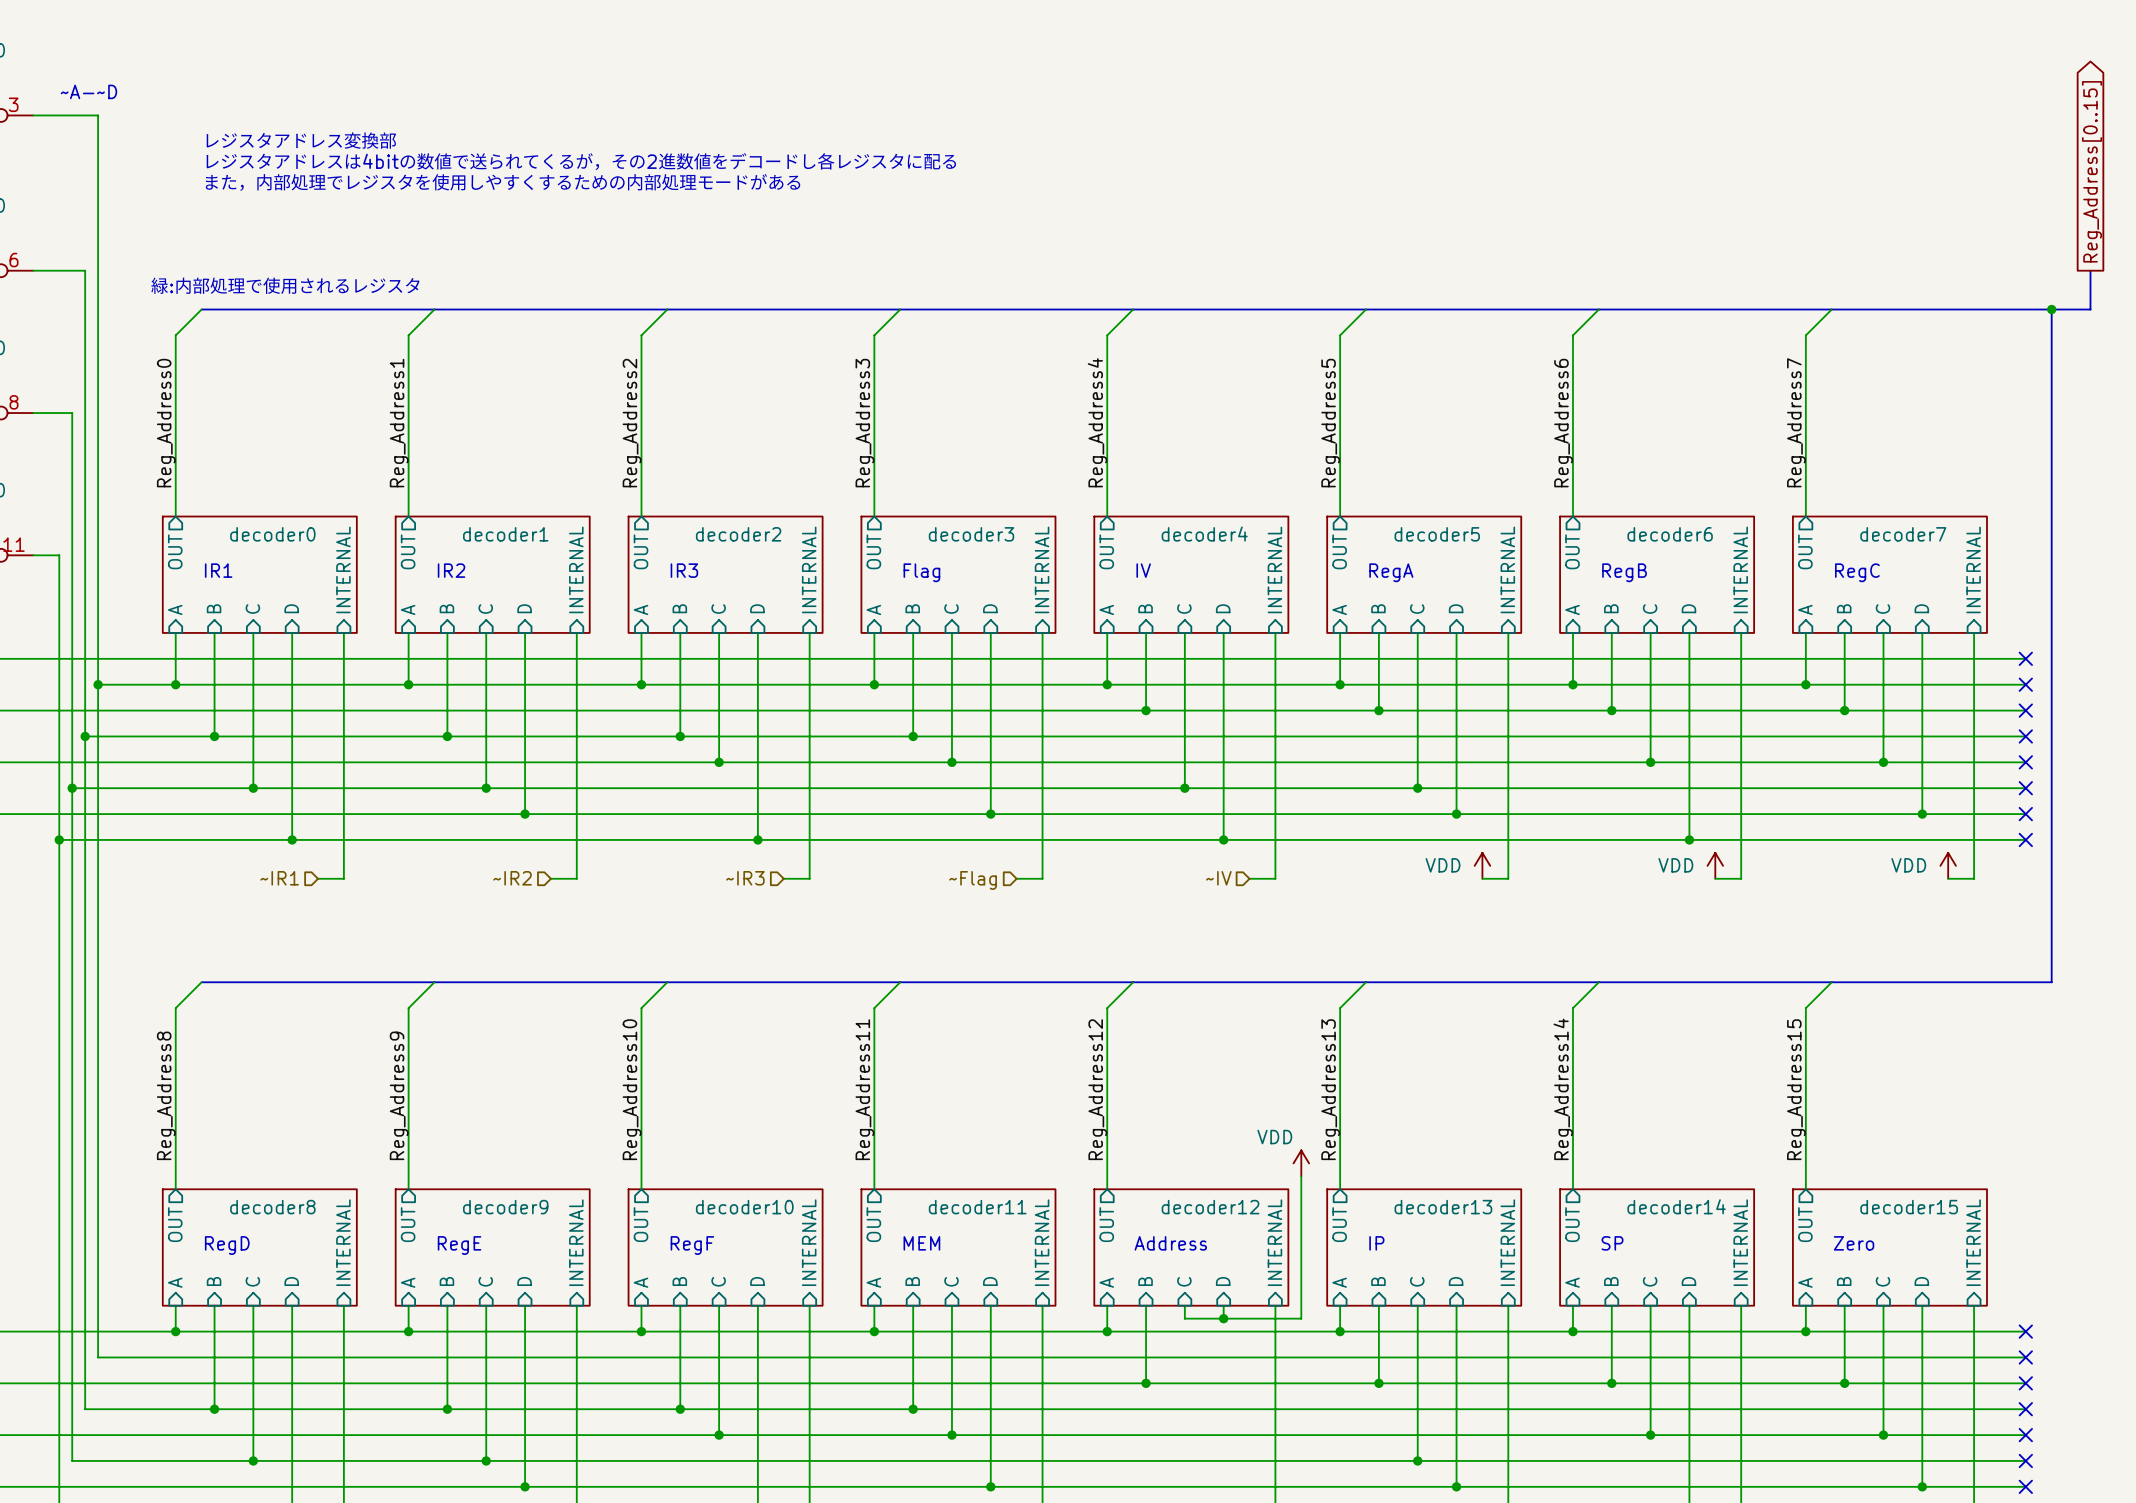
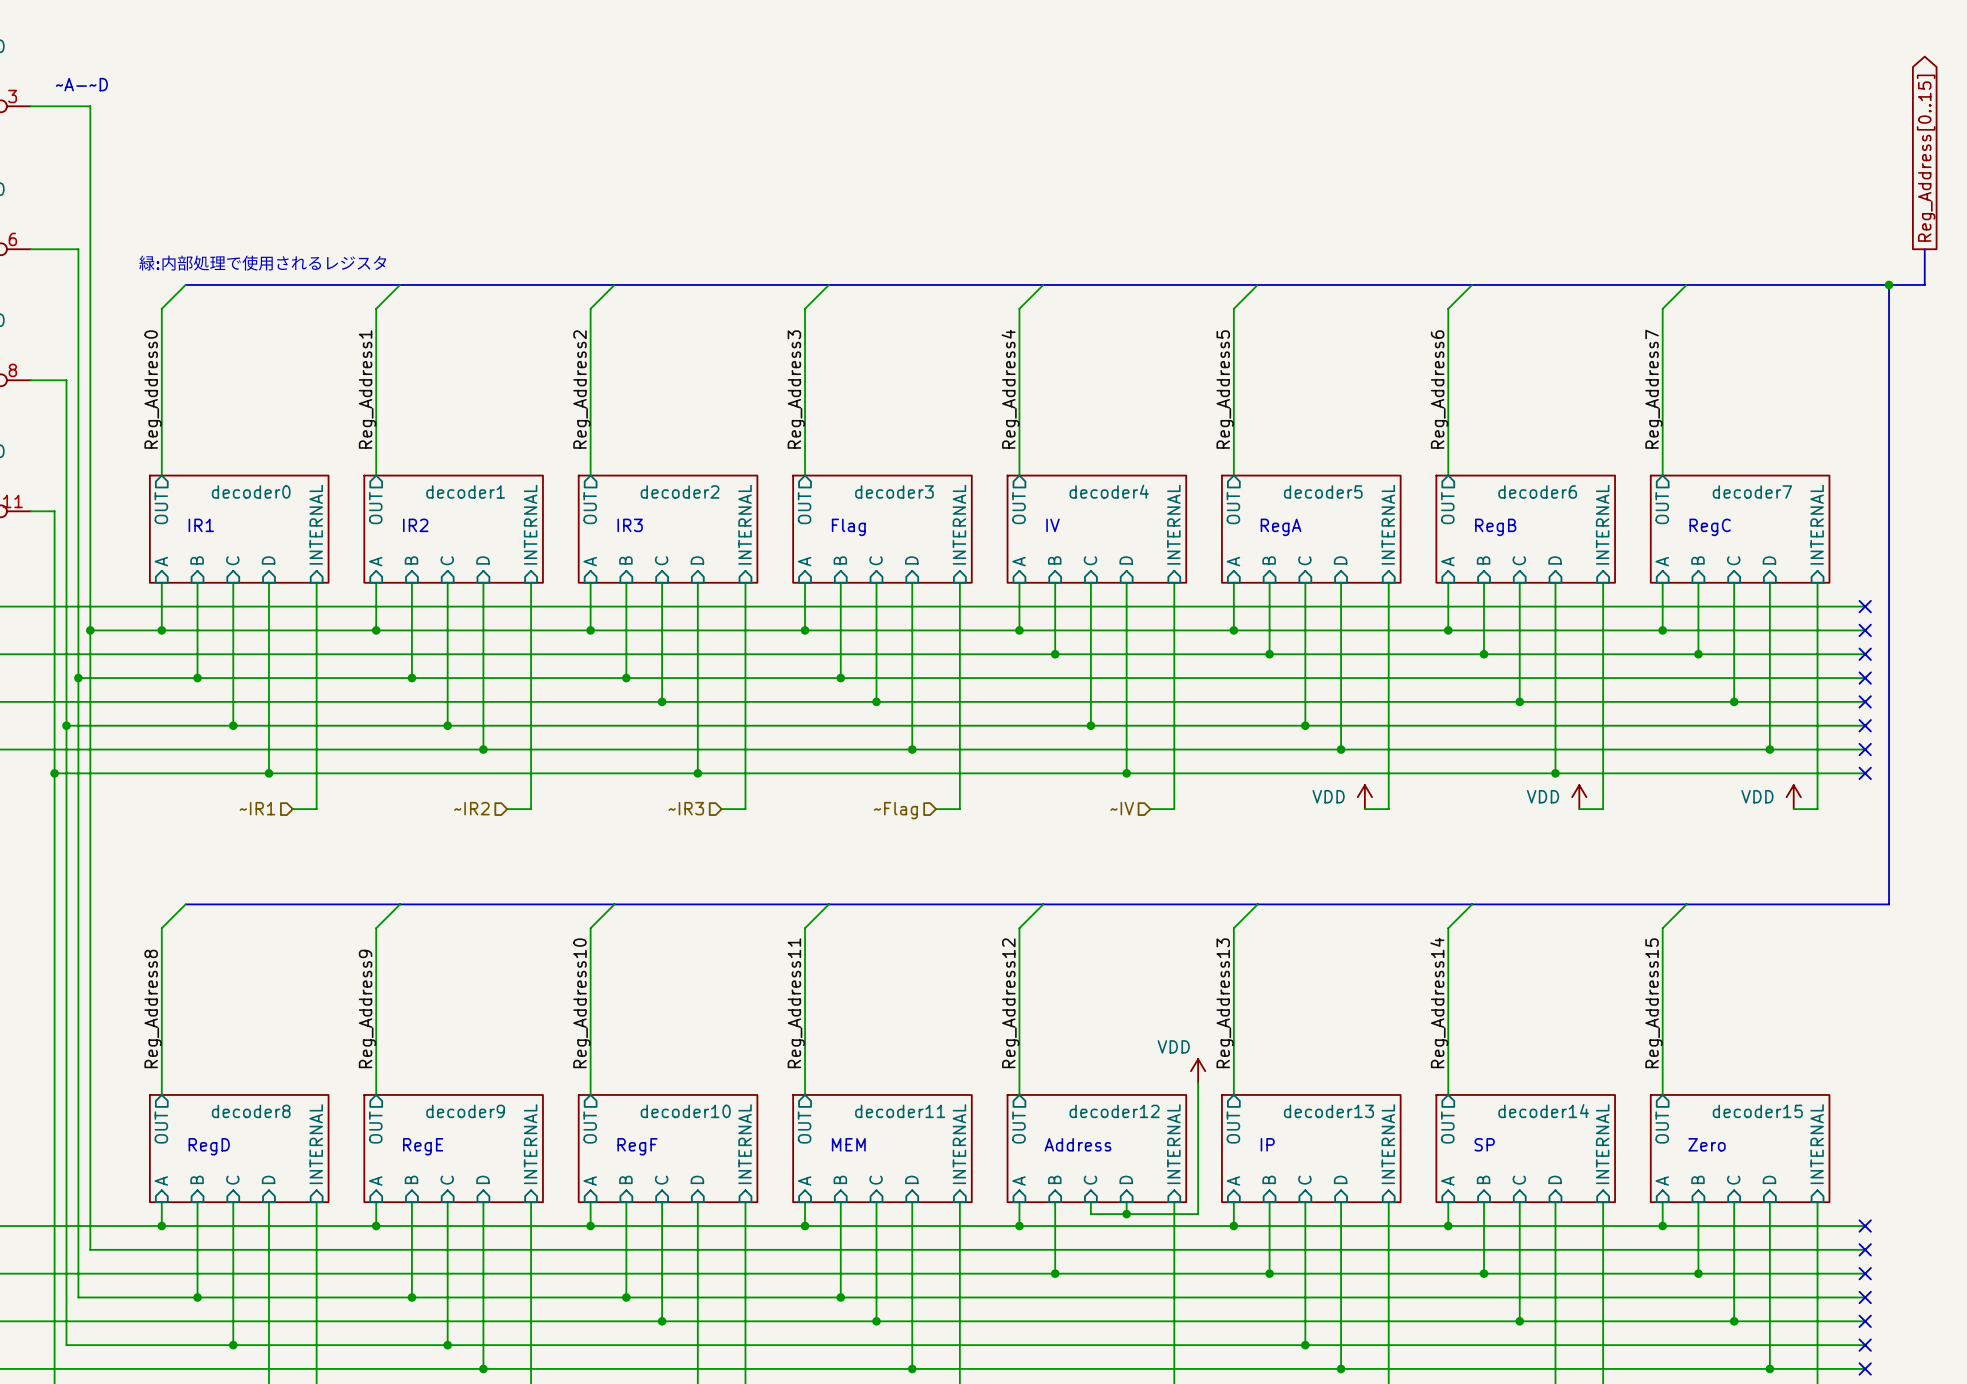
text: レジスタアドレス変換部 (301, 140) -> none
text: レジスタアドレスは4bitの数値で送られてくるが，その2進数値をデコードし各レジスタに配る (581, 161) -> none
text: また，内部処理でレジスタを使用しやすくするための内部処理モードがある (503, 182) -> none

